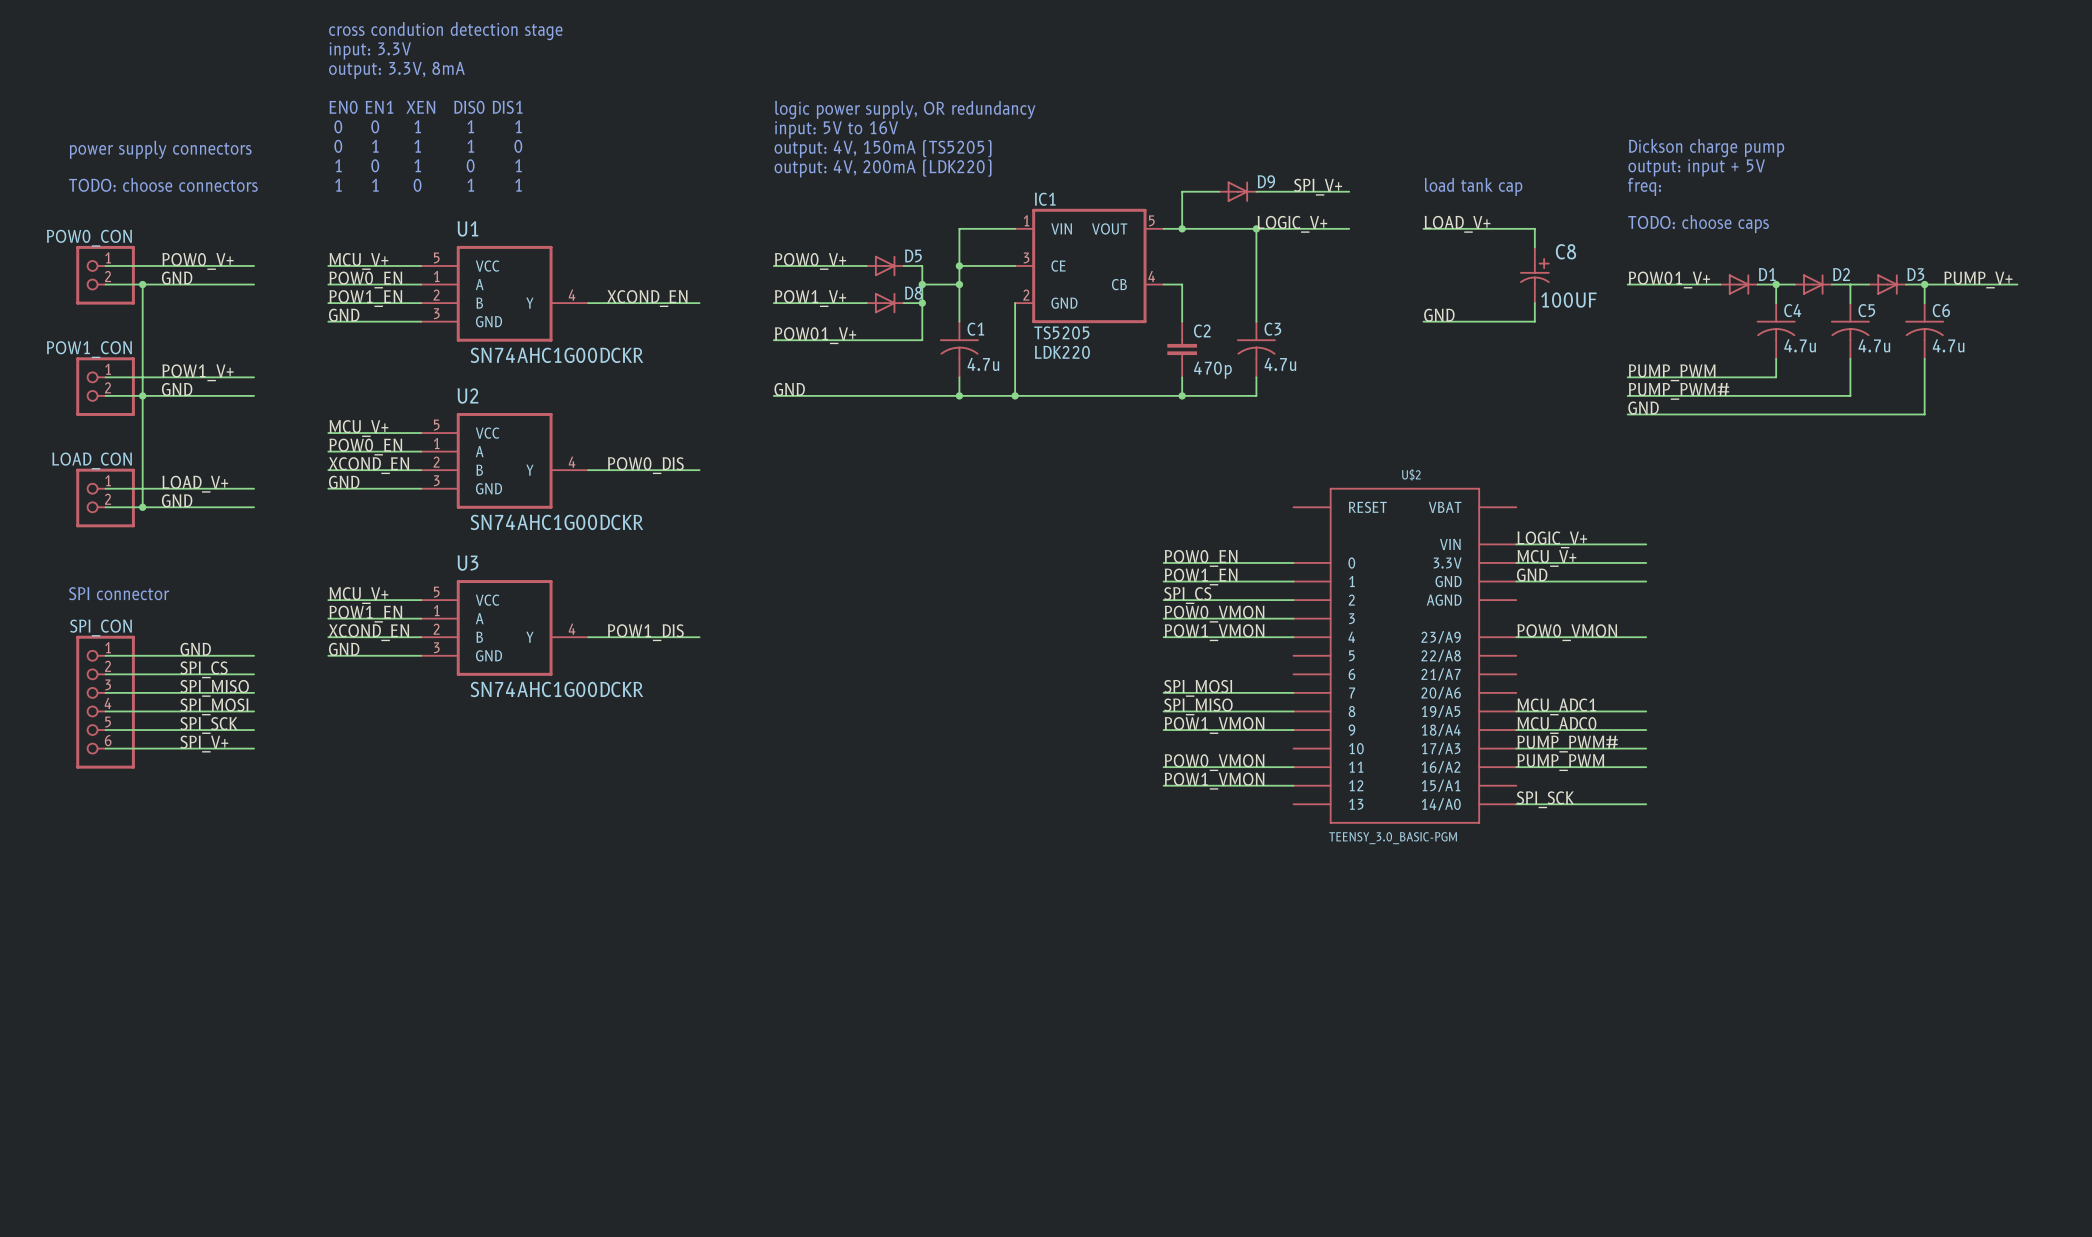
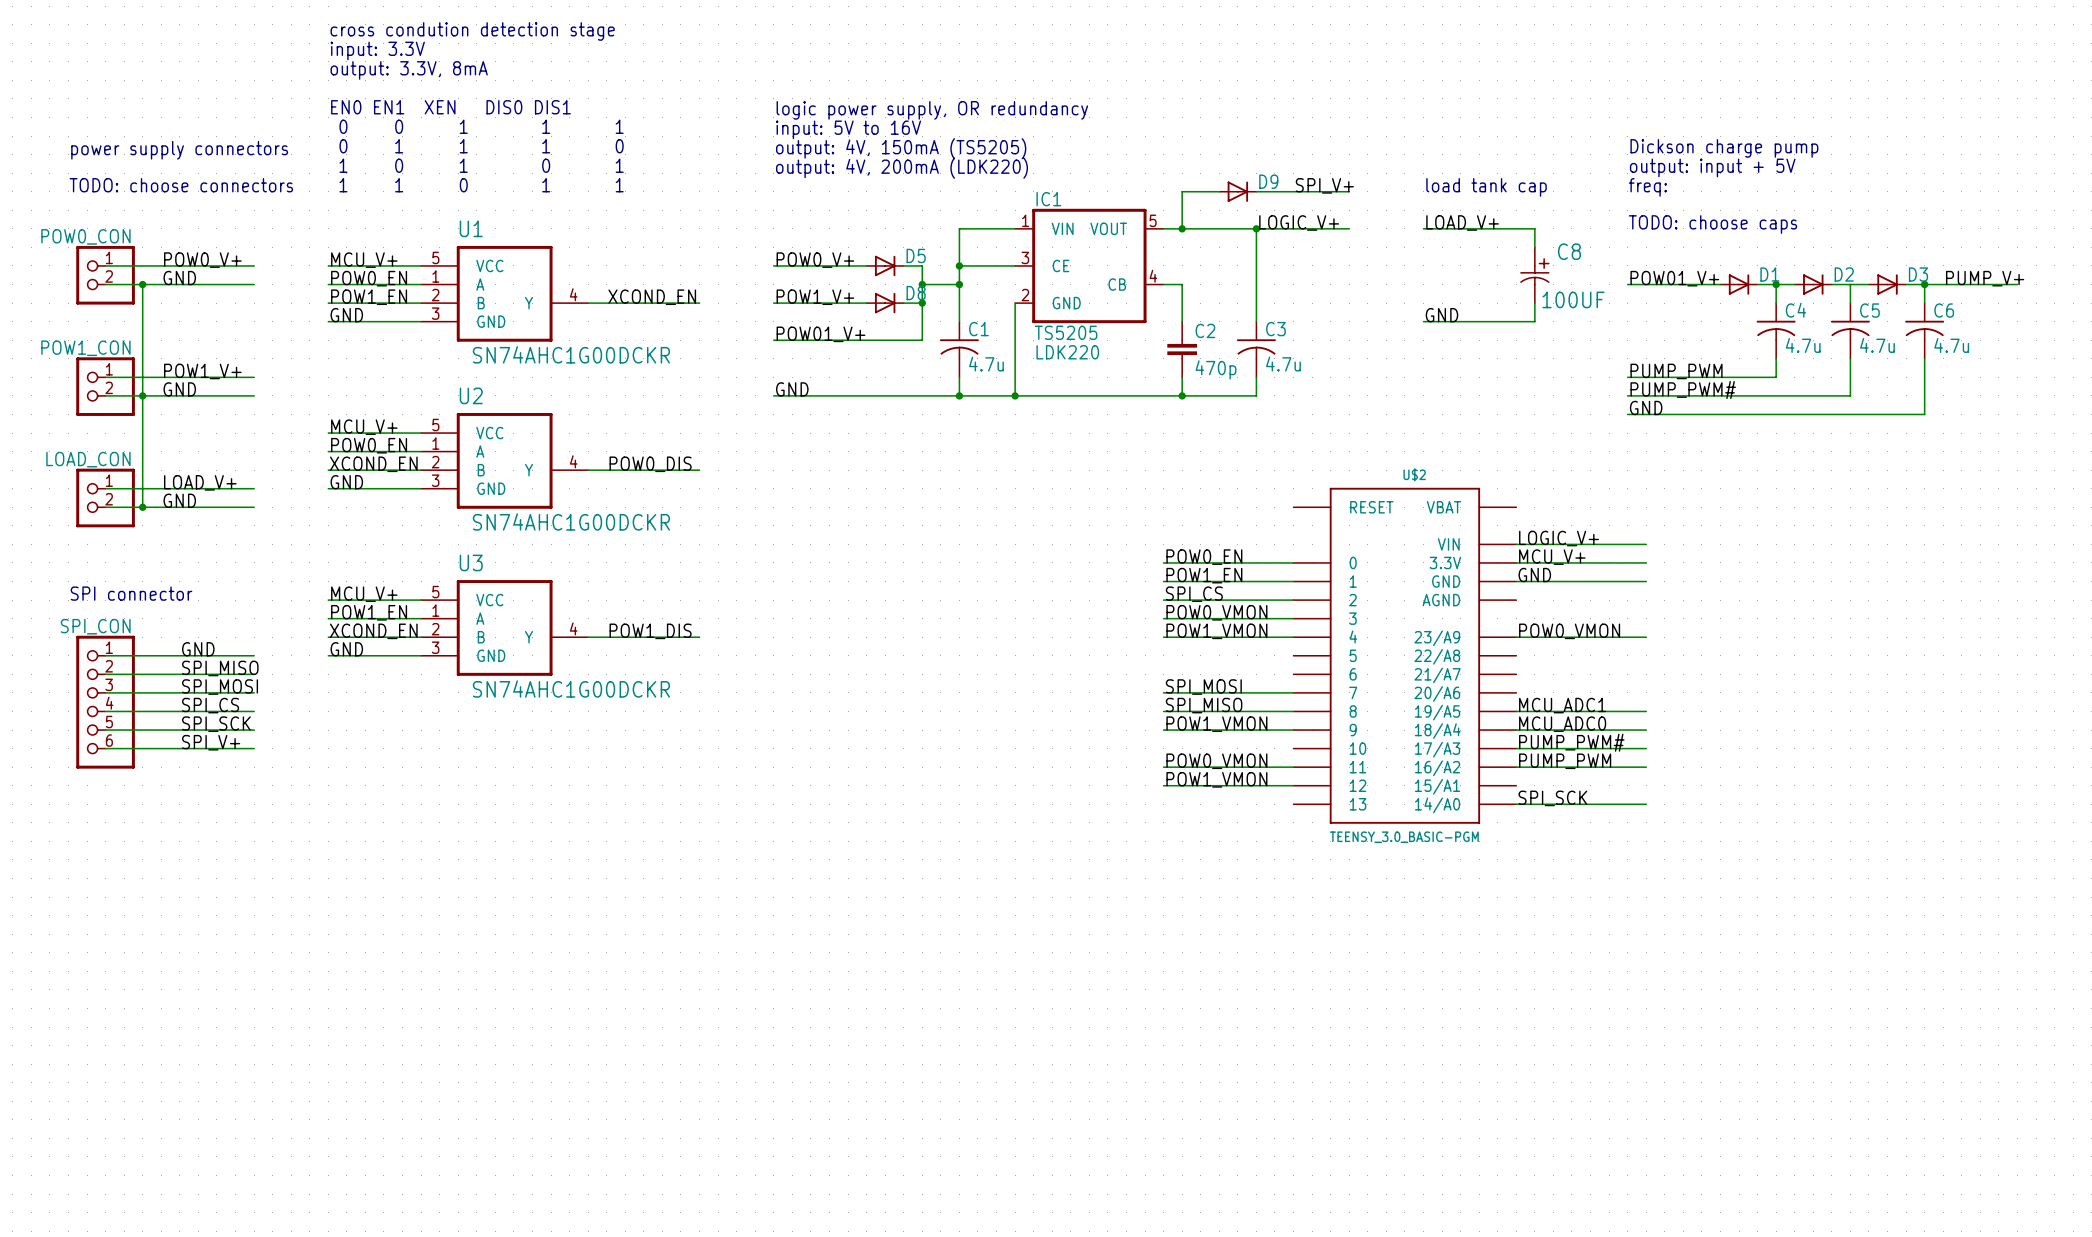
label: SPI_CS (204, 669) -> SPI_MISO (220, 668)
label: SPI_MISO (214, 688) -> SPI_MOSI (220, 687)
label: SPI_MOSI (214, 706) -> SPI_CS (210, 705)

